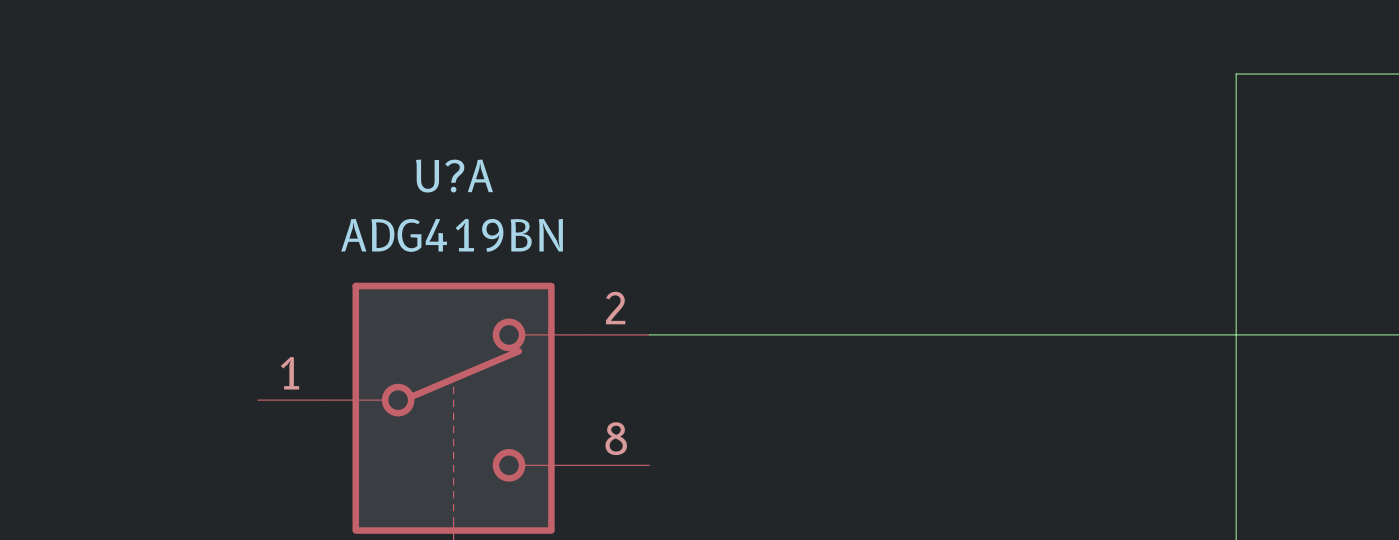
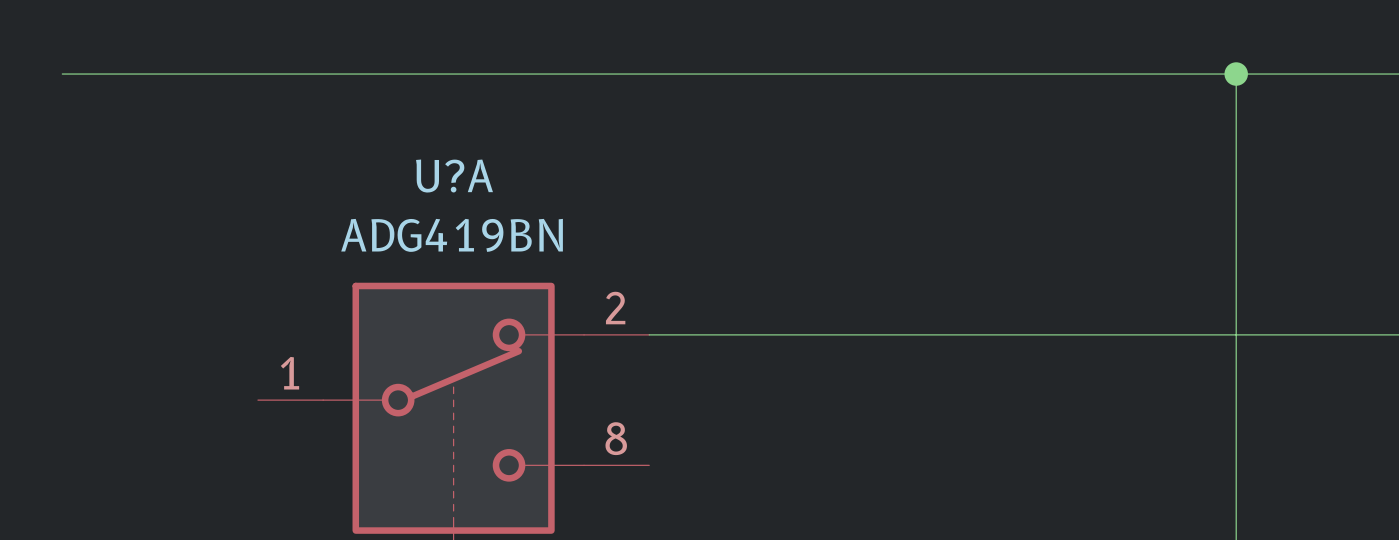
wire: none -> (62, 74) (1236, 74)
junction: none -> (1236, 74)

